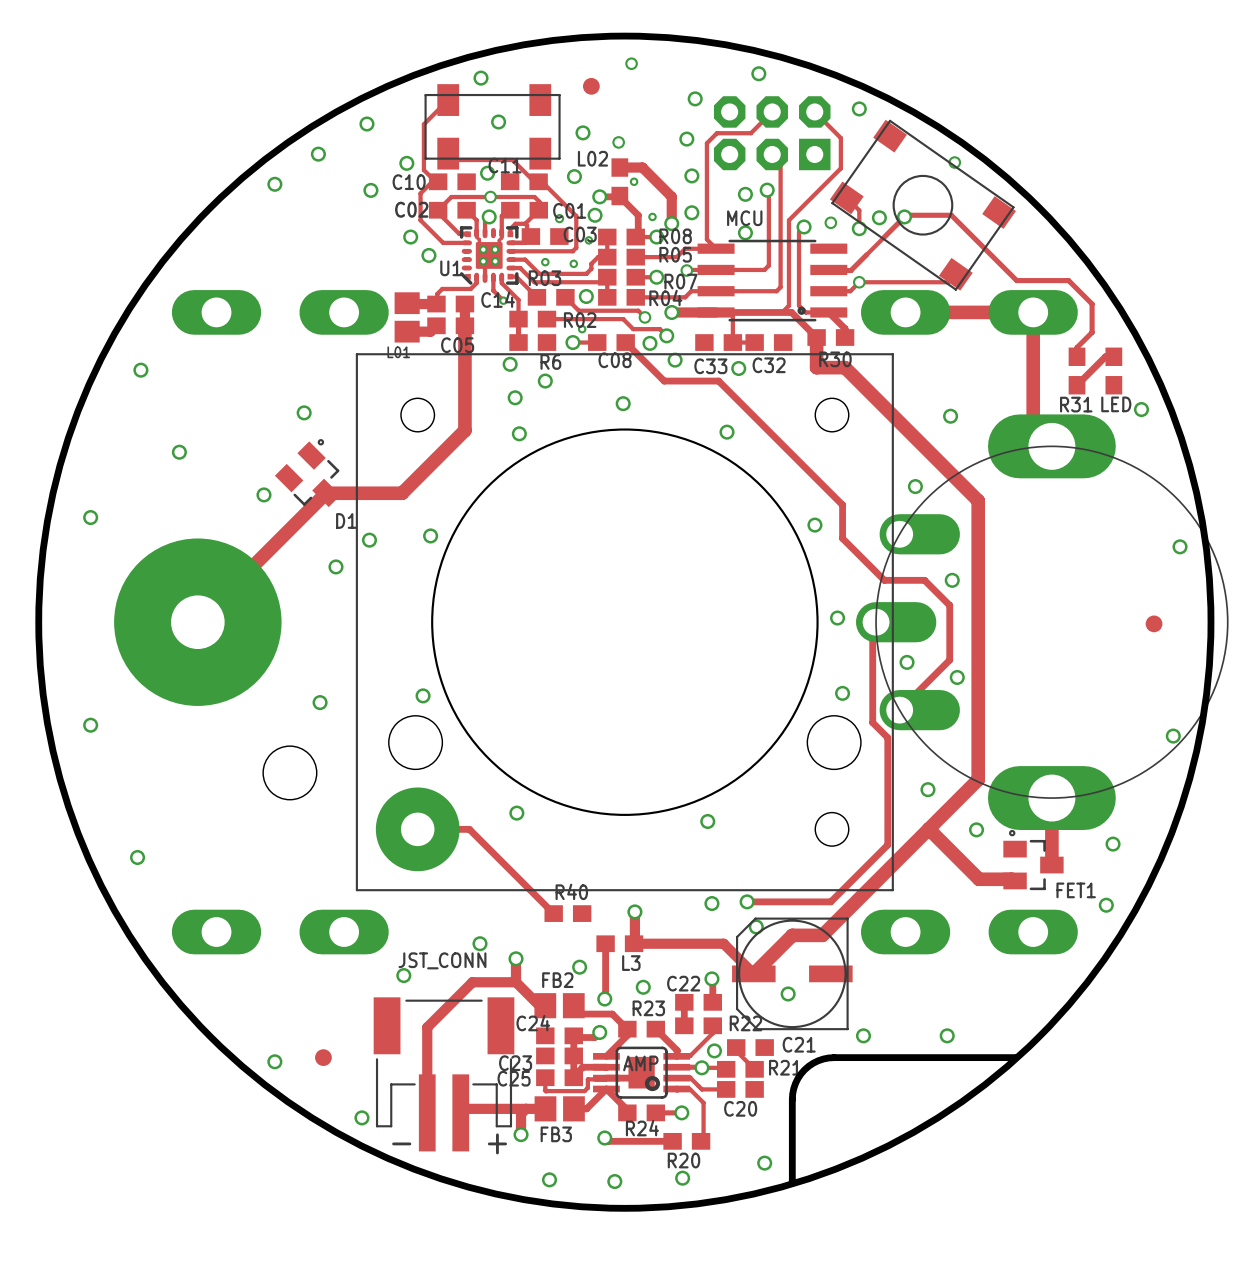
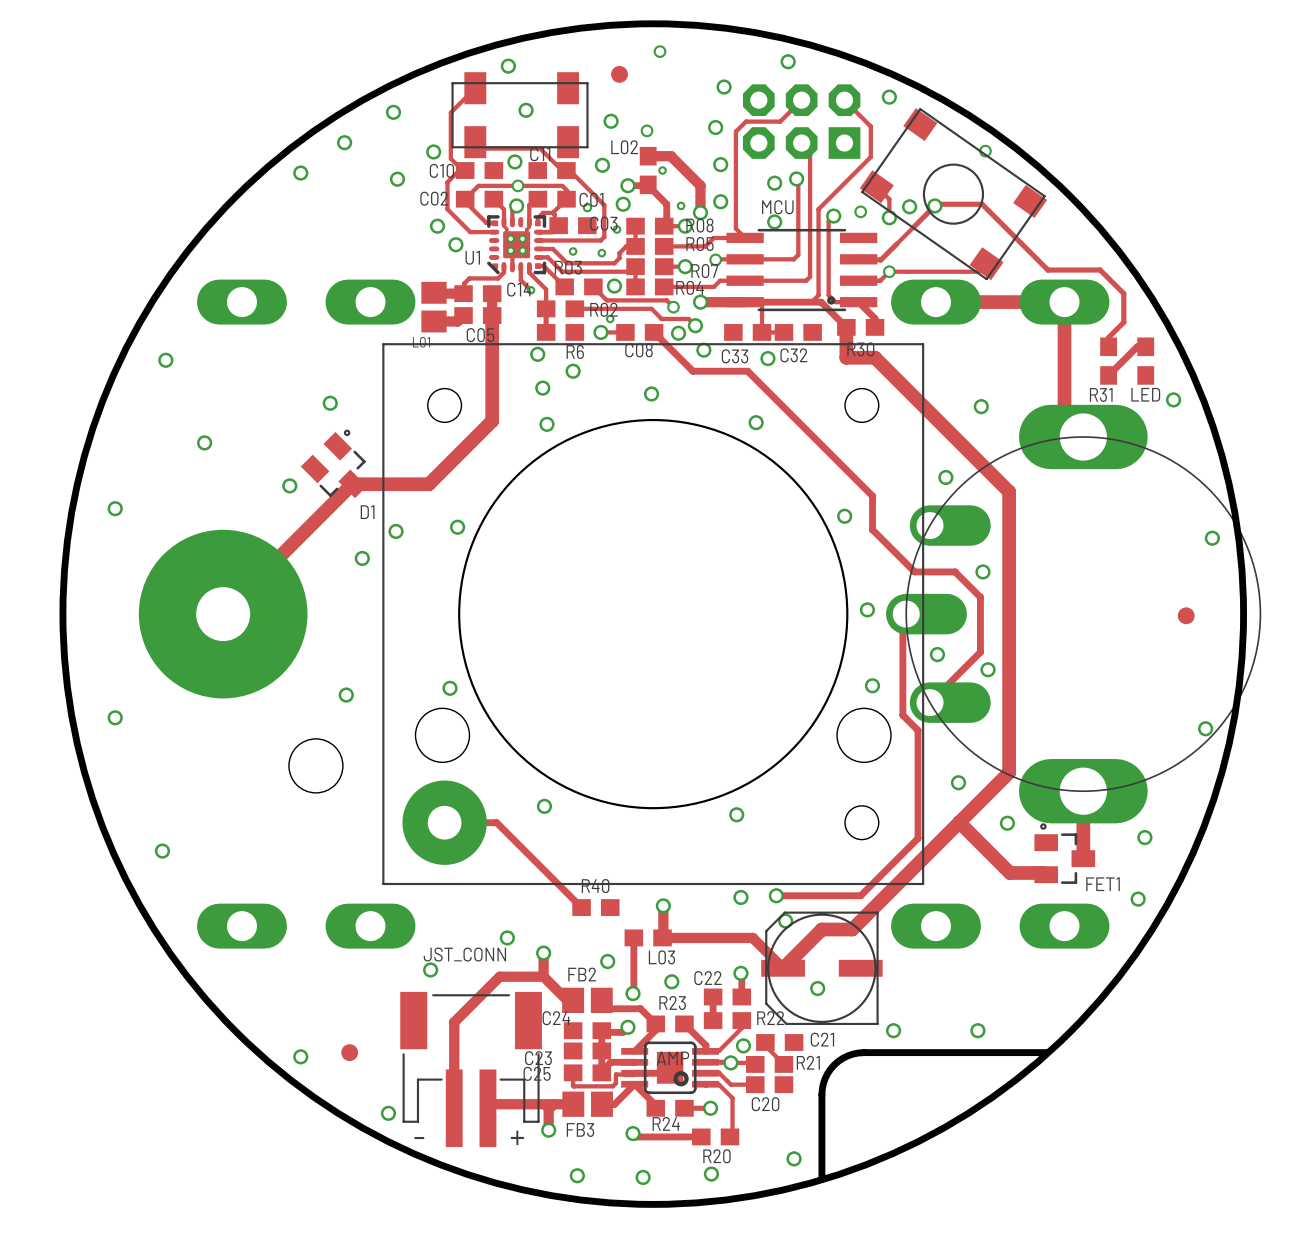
L3 name: L3 (631, 963) -> L03 (661, 957)

